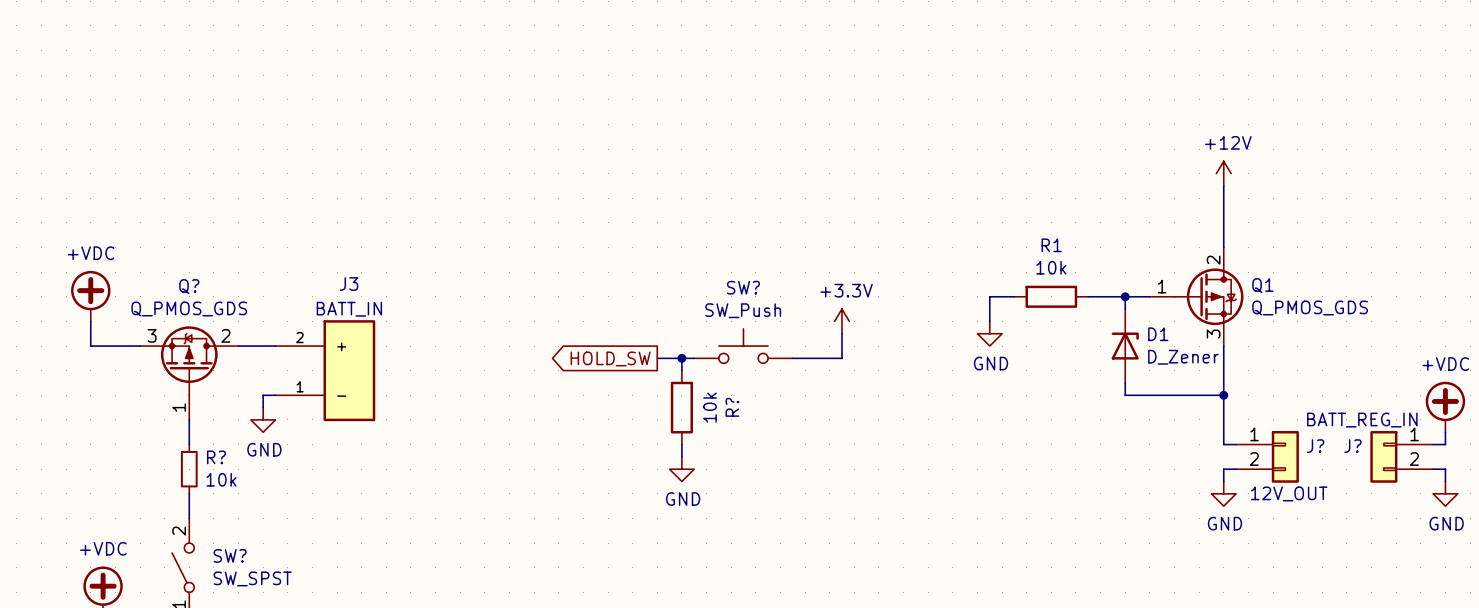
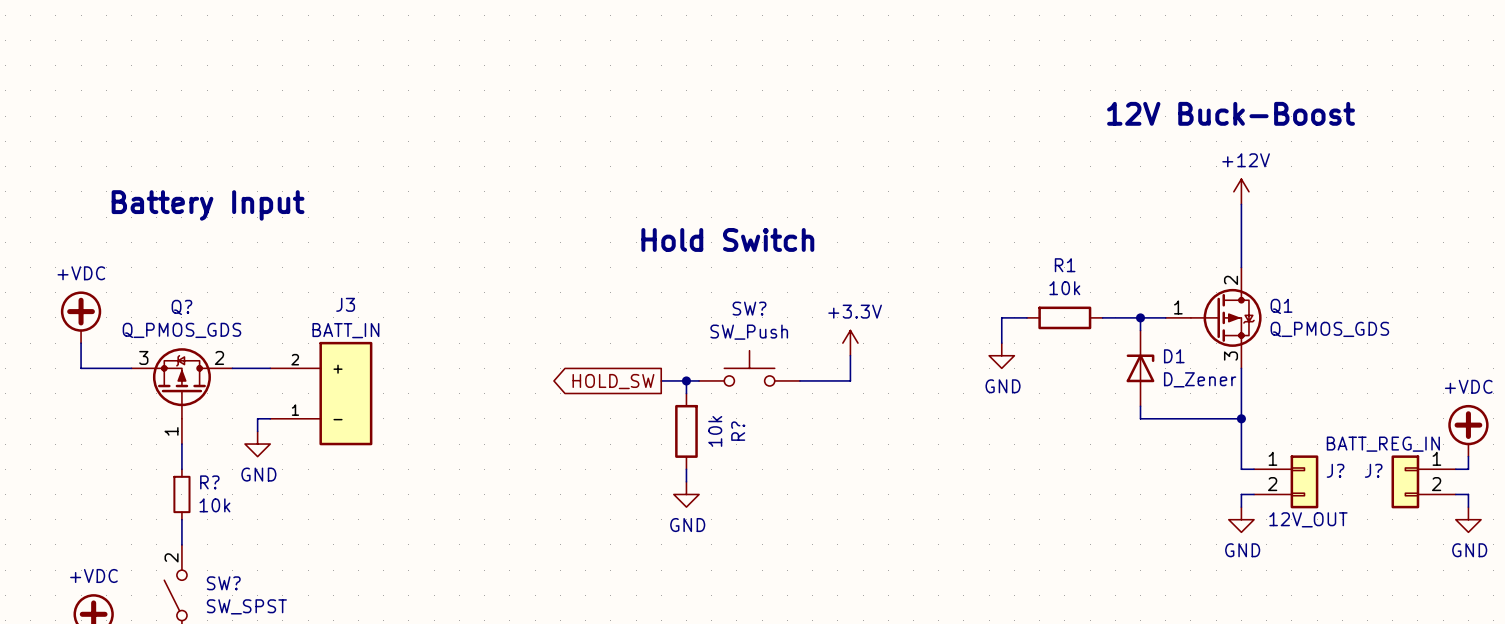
text: none -> 12V Buck-Boost (1231, 113)
text: none -> Battery Input (208, 205)
text: none -> Hold Switch (727, 239)

